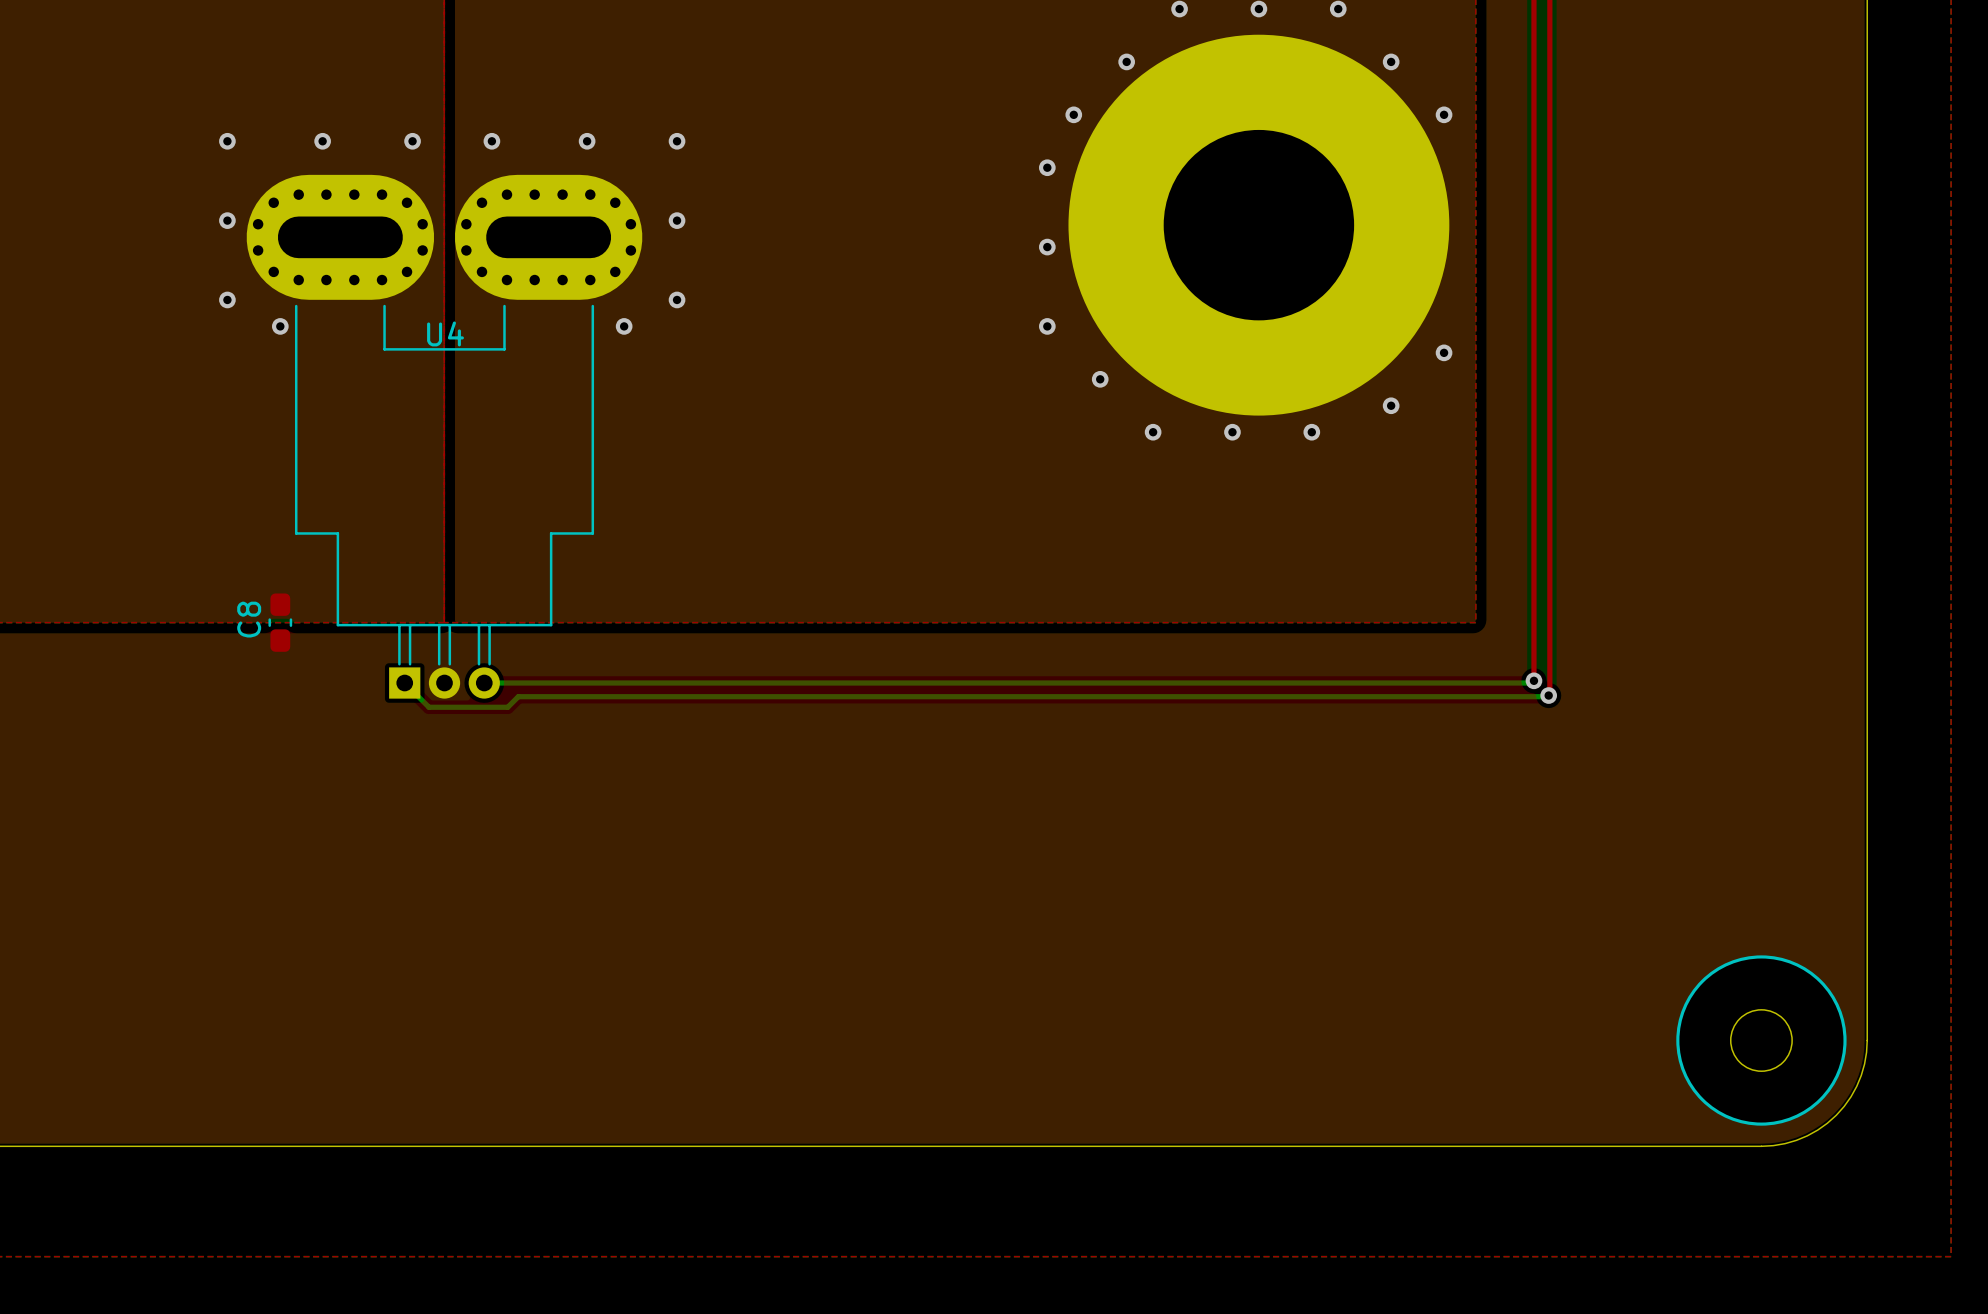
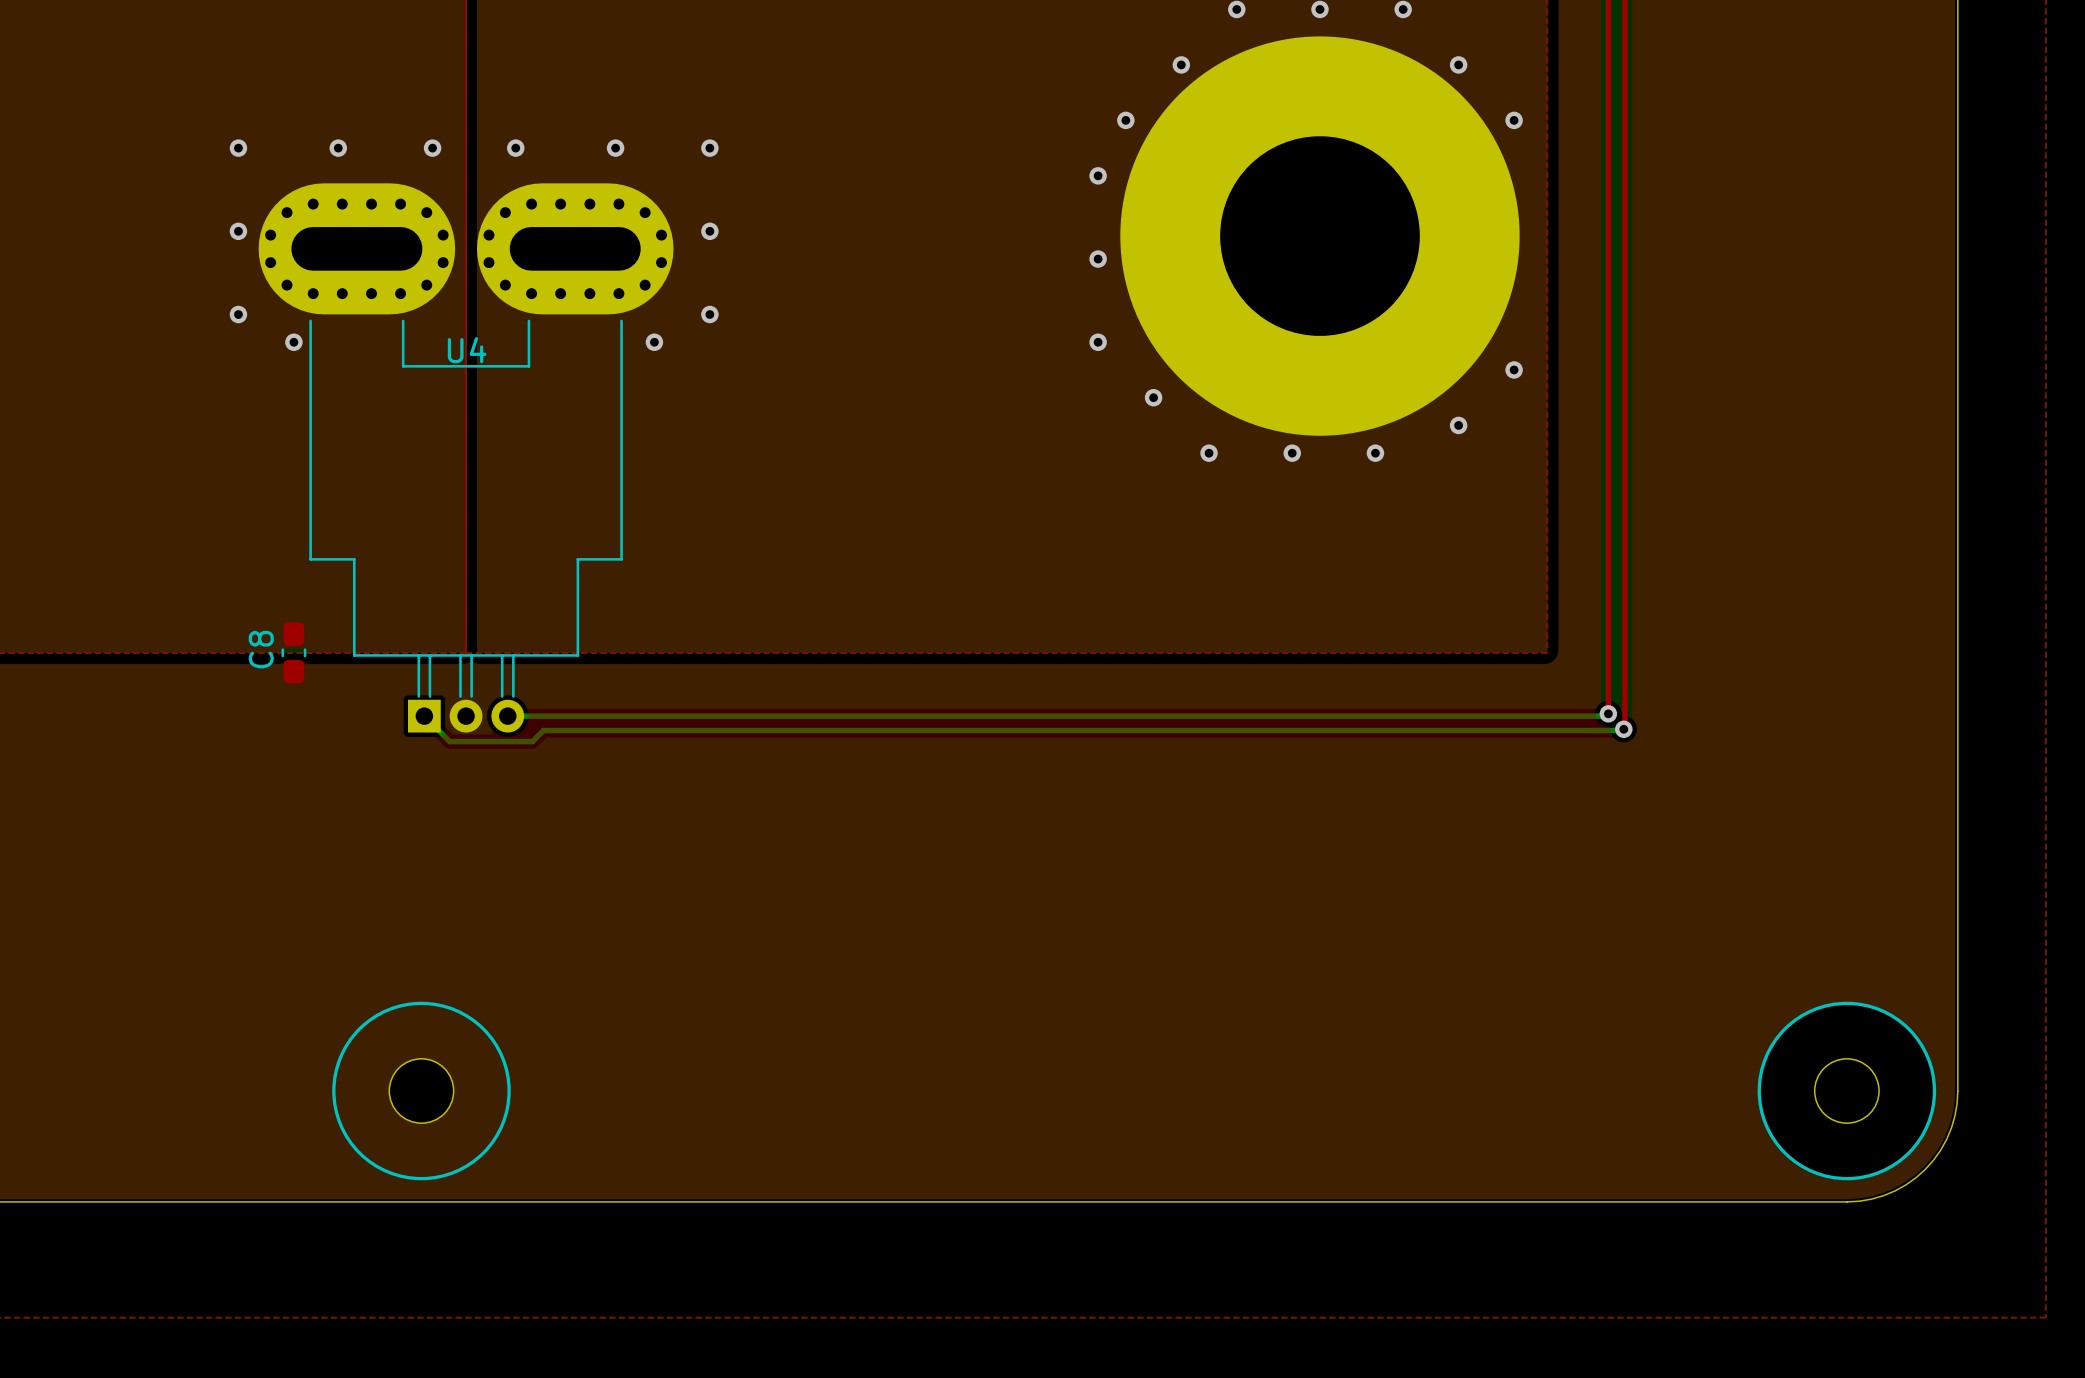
part: none -> (421, 1090)

